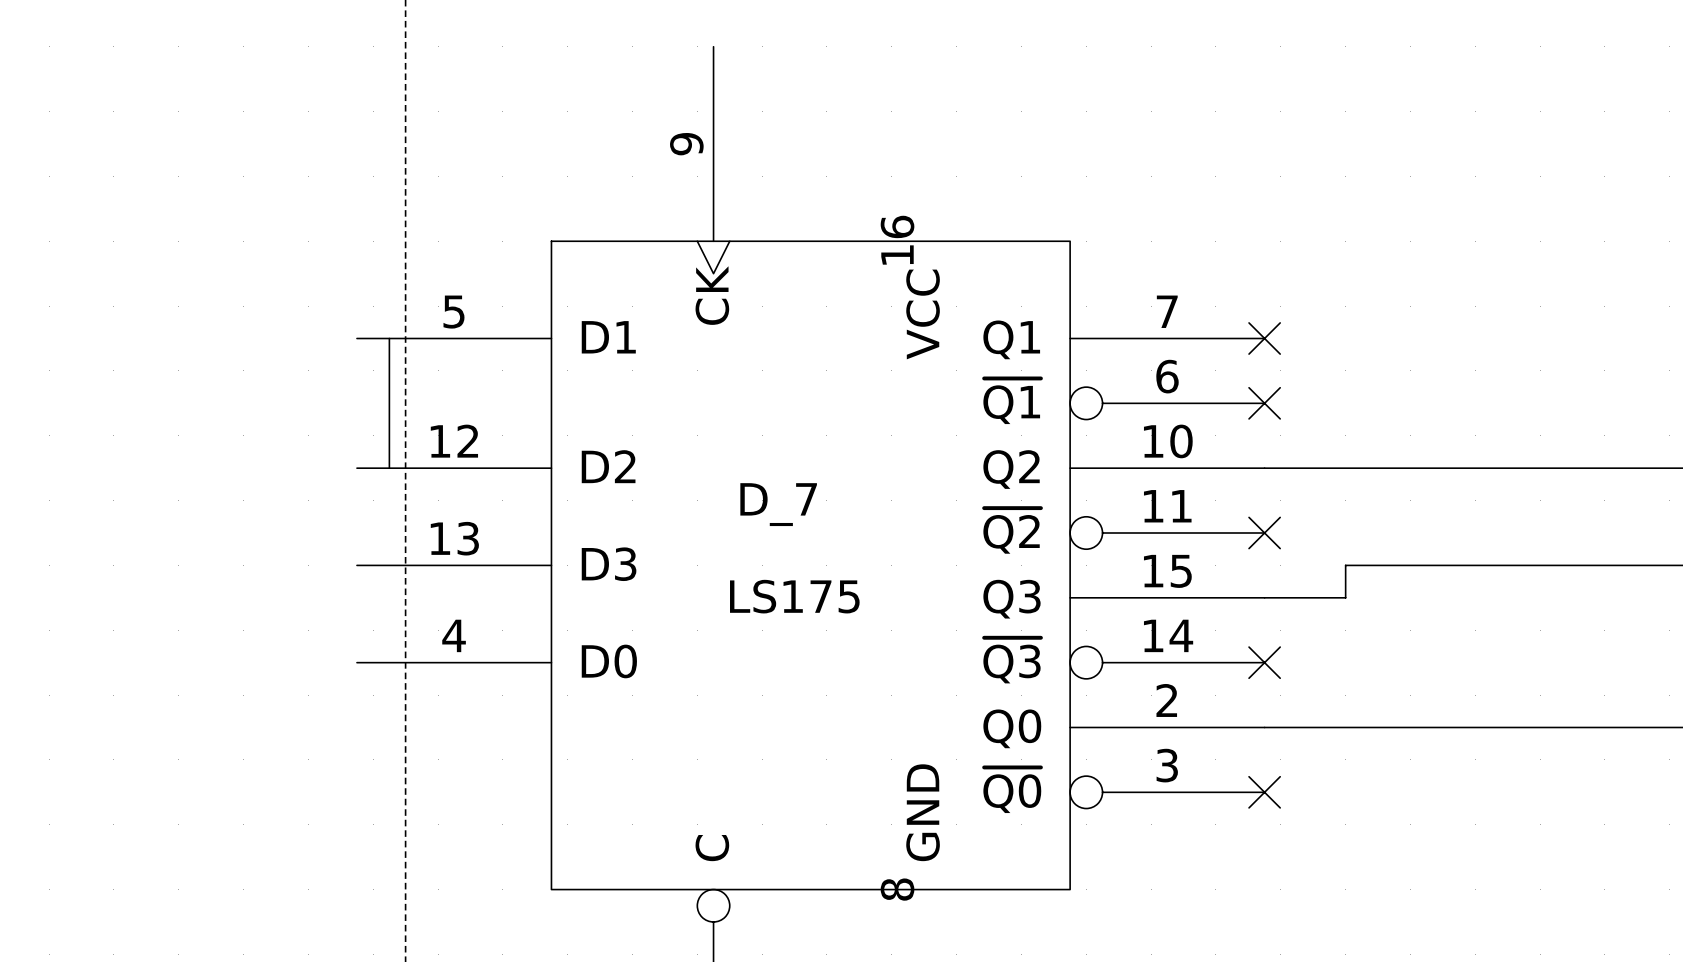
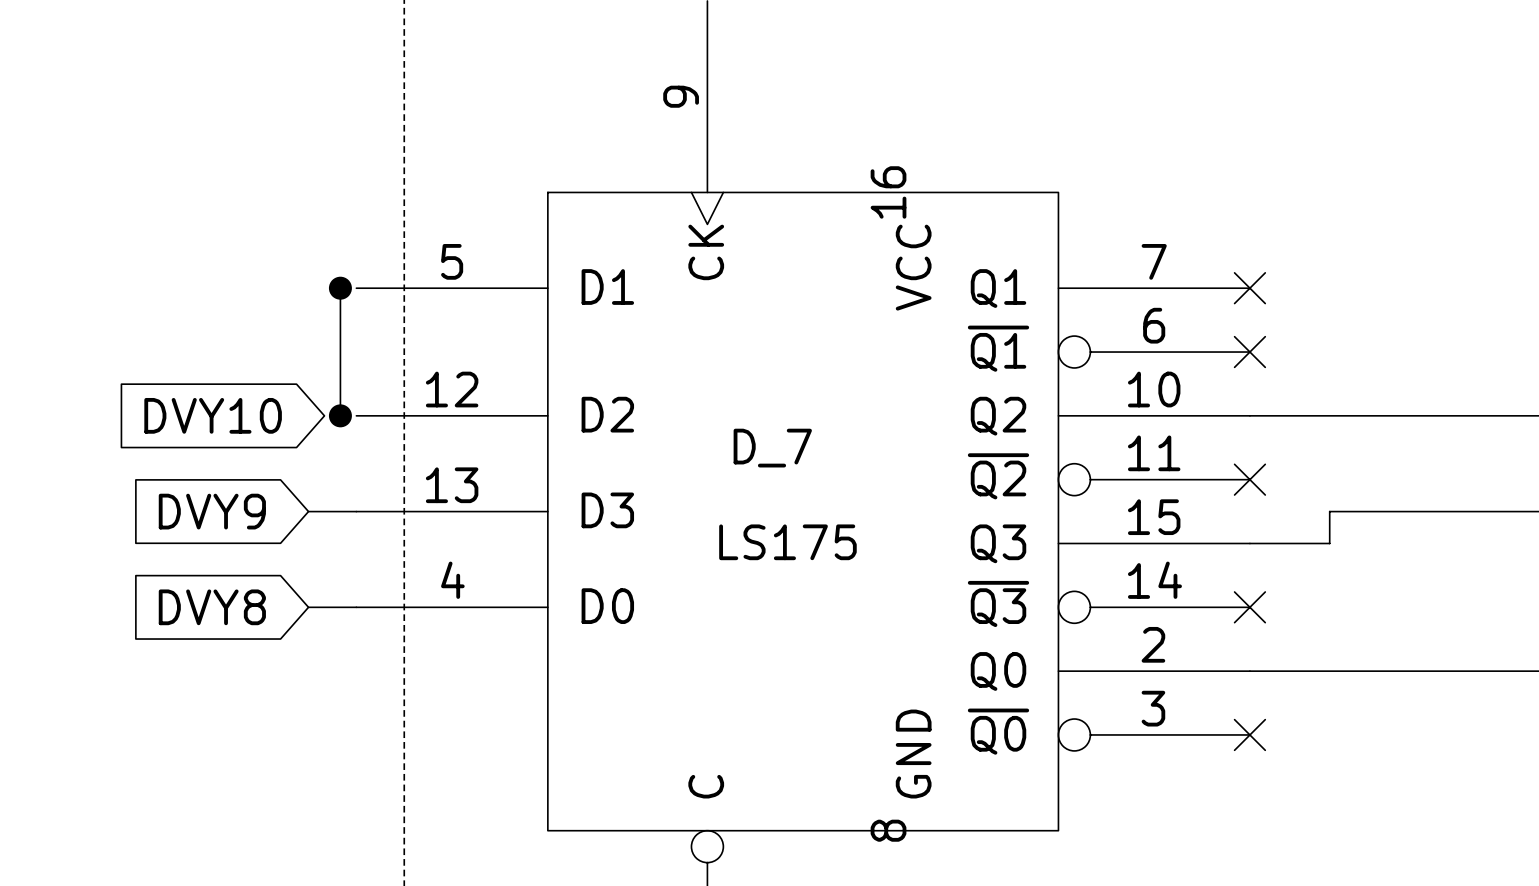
junction: none -> (340, 288)
wire: (389, 338) (389, 468) -> (340, 288) (340, 415)
global label: none -> DVY10 (213, 415)
junction: none -> (340, 415)
global label: none -> DVY9 (212, 511)
wire: none -> (308, 511) (356, 511)
global label: none -> DVY8 (212, 607)
wire: none -> (308, 607) (356, 607)

